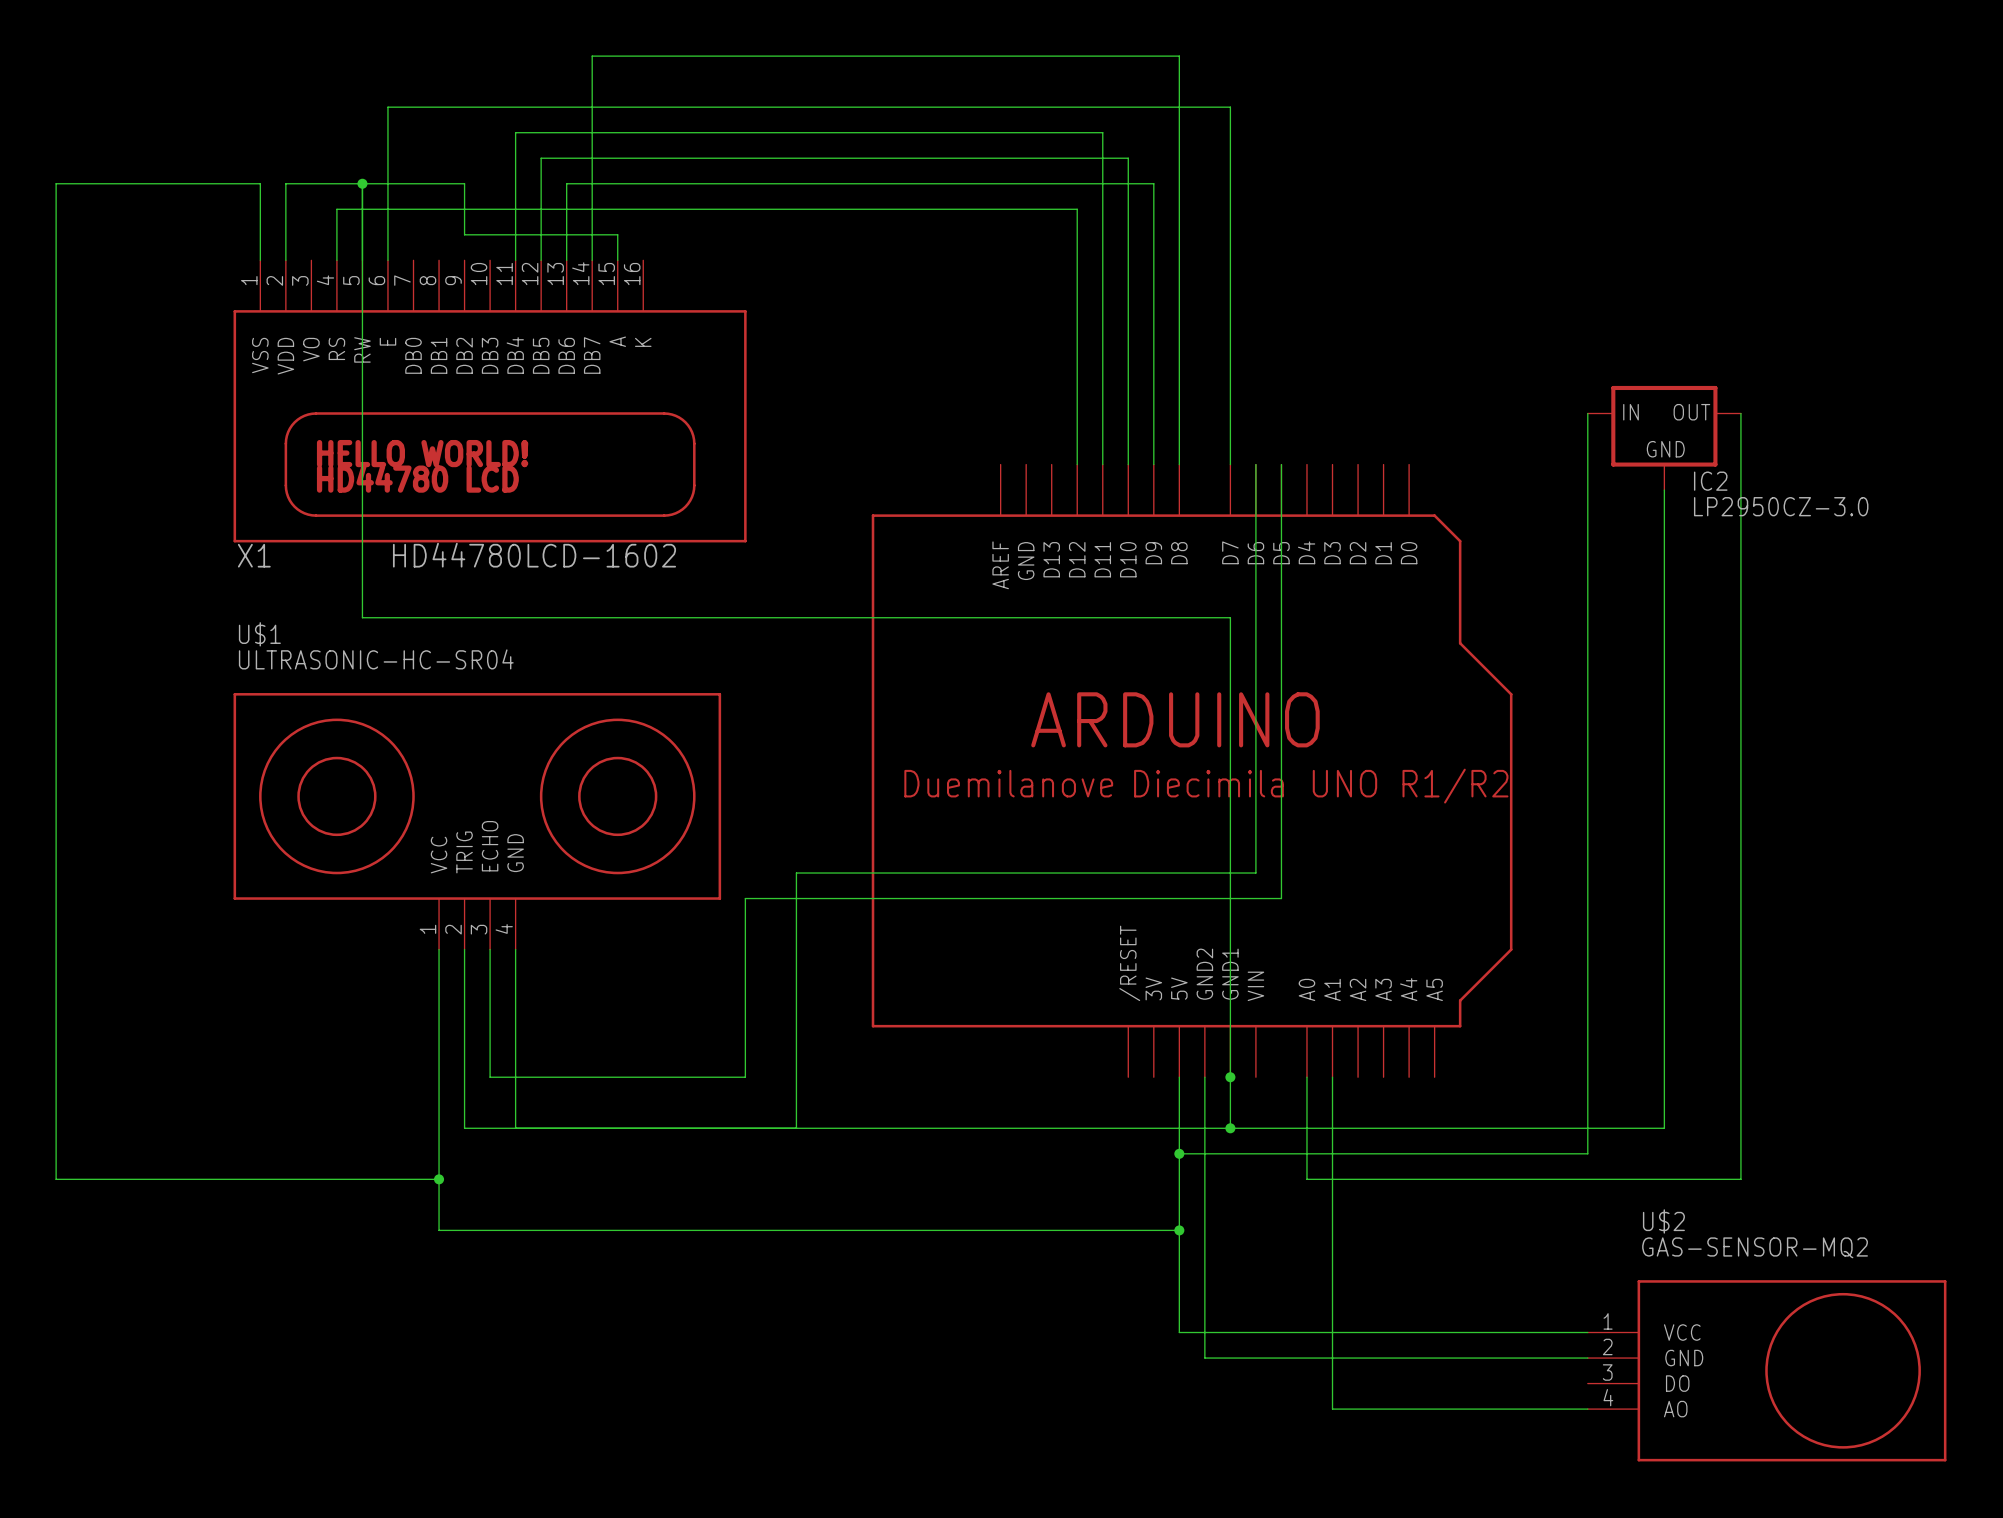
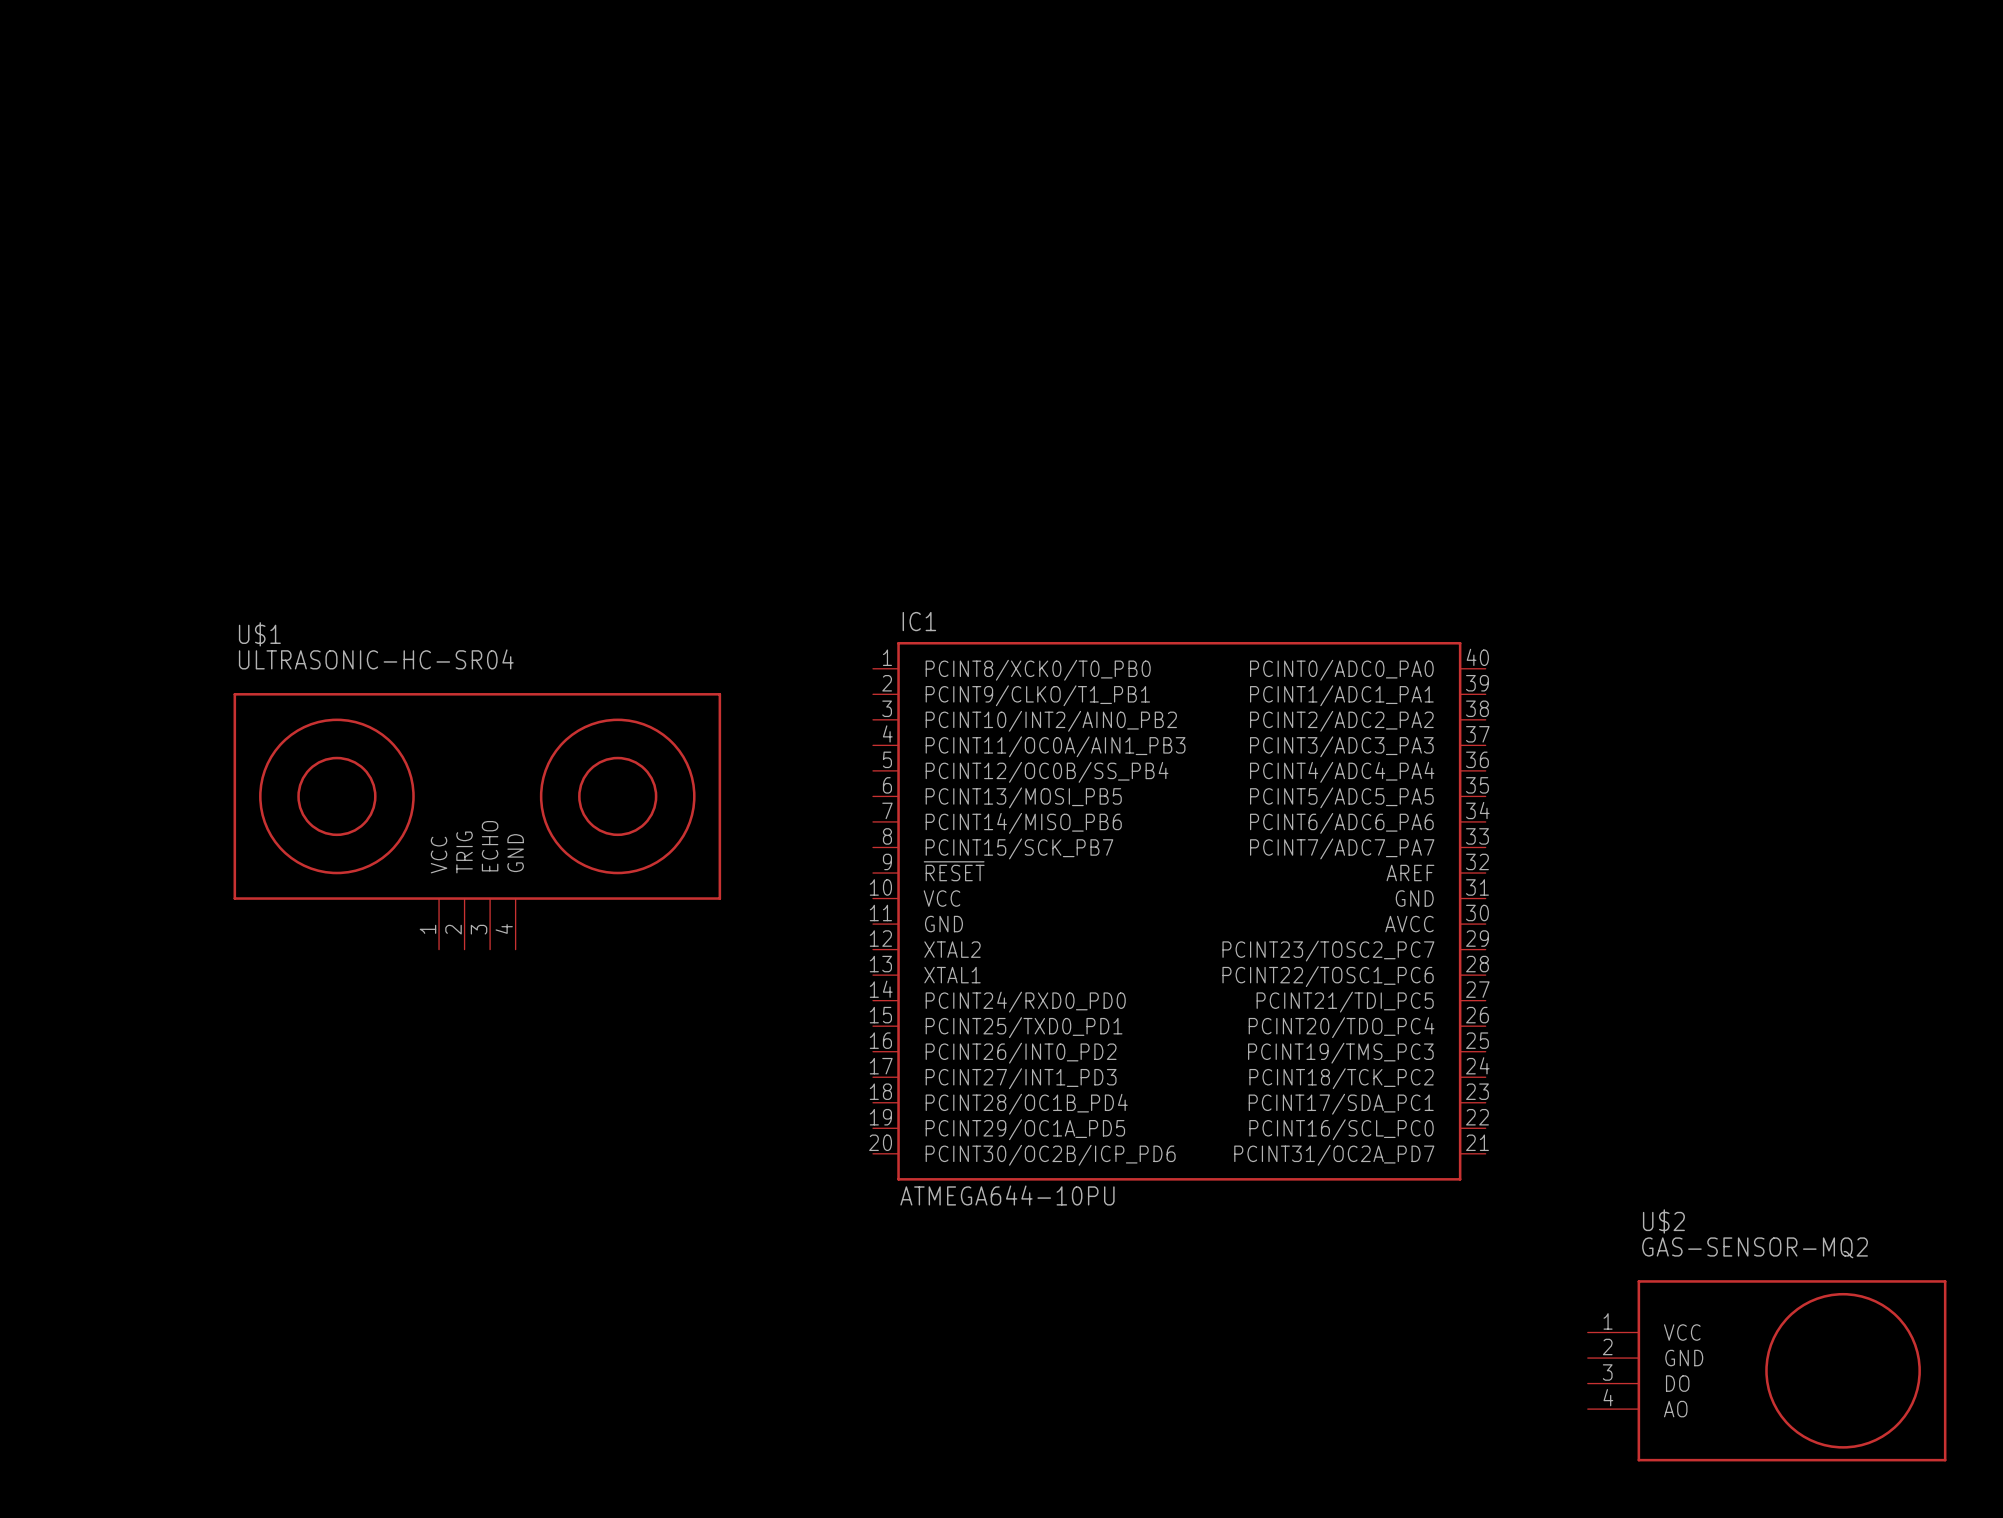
wire: (362, 183) (362, 617) (1230, 617) (1230, 1128) -> none
junction: (362, 183) -> none
wire: (260, 260) (260, 183) (56, 183) (56, 1179) (439, 1179) -> none
wire: (285, 260) (285, 183) (464, 183) (464, 234) (617, 234) (617, 260) -> none
wire: (336, 260) (336, 209) (1077, 209) (1077, 464) -> none
wire: (387, 260) (387, 107) (1230, 107) (1230, 464) -> none
wire: (515, 260) (515, 132) (1102, 132) (1102, 464) -> none
wire: (541, 260) (541, 158) (1128, 158) (1128, 464) -> none
wire: (566, 260) (566, 183) (1153, 183) (1153, 464) -> none
wire: (592, 260) (592, 56) (1179, 56) (1179, 464) -> none
X1: HD44780LCD-1602 (490, 401) -> none
wire: (1587, 413) (1587, 1153) (1179, 1153) -> none
wire: (1740, 413) (1740, 1179) (1306, 1179) (1306, 1077) -> none
IC2: LP2950CZ-3.0 (1664, 438) -> none
wire: (1255, 464) (1255, 873) (796, 873) (796, 1128) -> none
wire: (1281, 464) (1281, 898) (745, 898) (745, 1077) (490, 1077) (490, 949) -> none
wire: (1664, 490) (1664, 1128) (464, 1128) (464, 949) -> none
part: (1192, 770) -> none
IC1: none -> ATMEGA644-10PU (1179, 911)
wire: (439, 949) (439, 1230) (1179, 1230) -> none
wire: (515, 949) (515, 1128) -> none
wire: (1179, 1077) (1179, 1332) (1587, 1332) -> none
wire: (1204, 1077) (1204, 1358) (1587, 1358) -> none
junction: (1230, 1077) -> none
wire: (1332, 1077) (1332, 1409) (1587, 1409) -> none
junction: (1230, 1128) -> none
junction: (1179, 1153) -> none
junction: (439, 1179) -> none
junction: (1179, 1230) -> none

